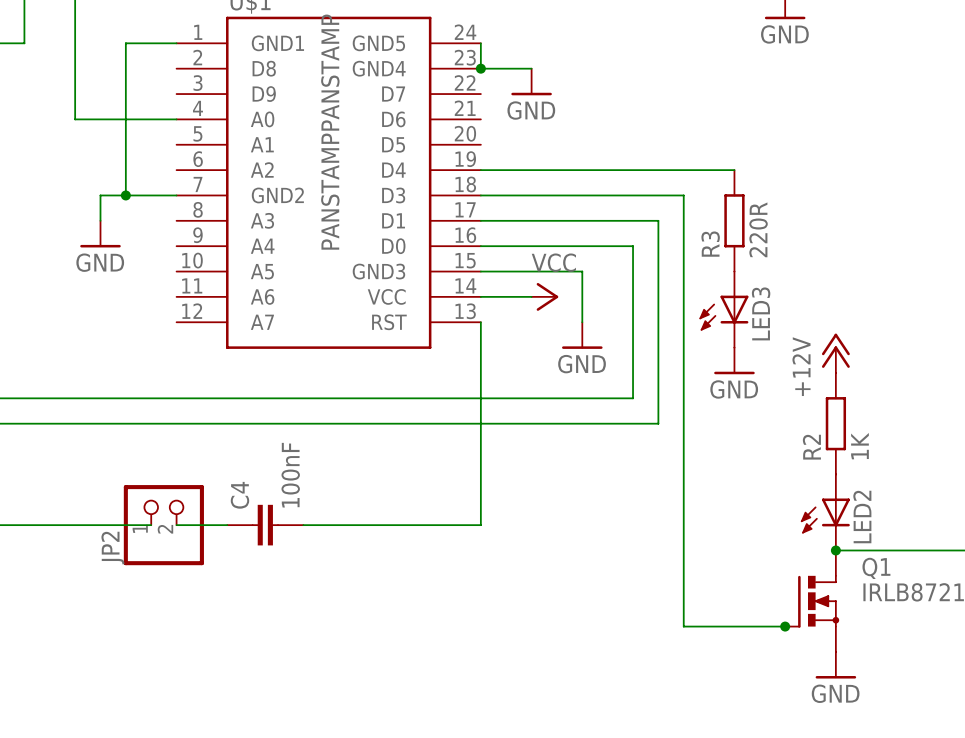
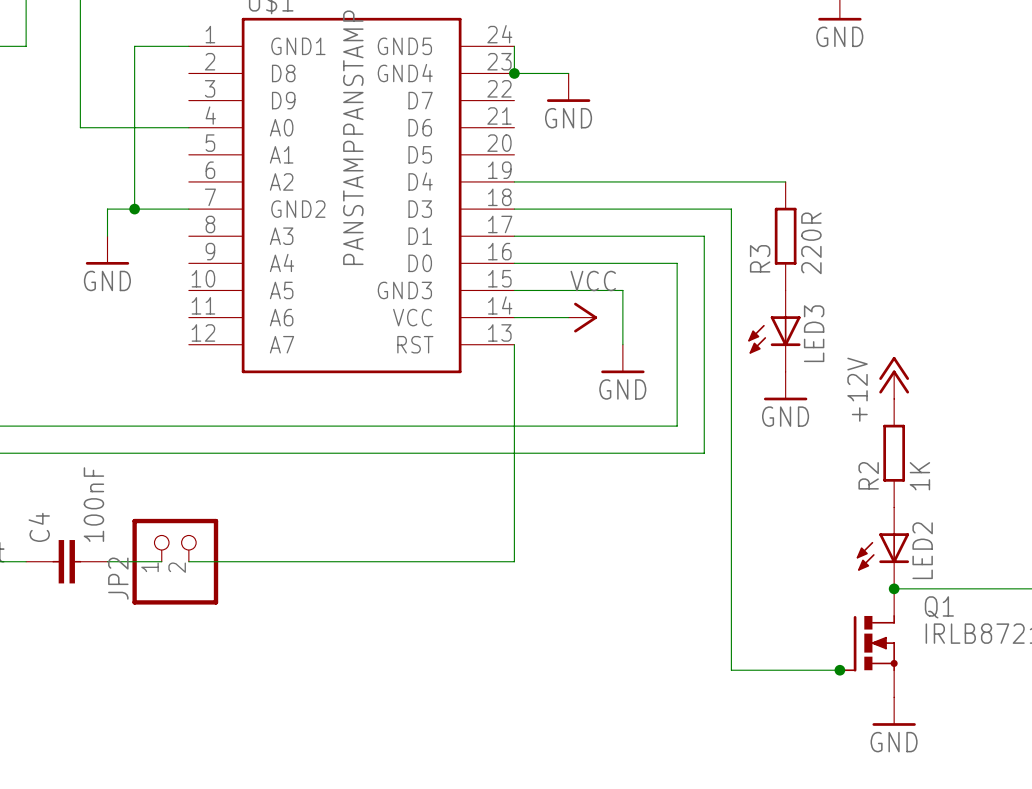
C4 position: (265, 525) -> (66, 561)

